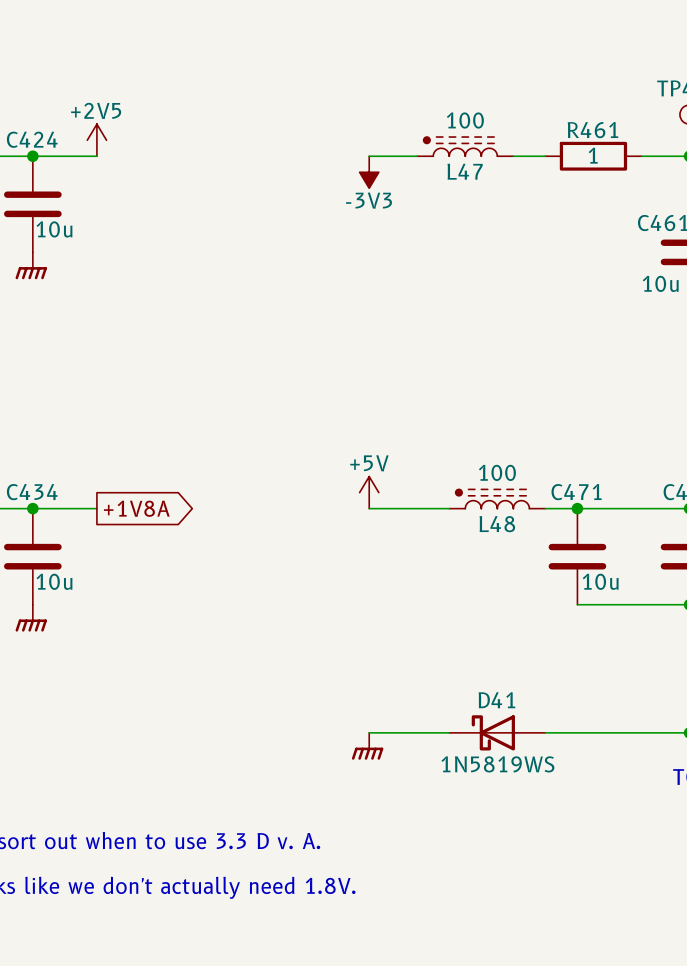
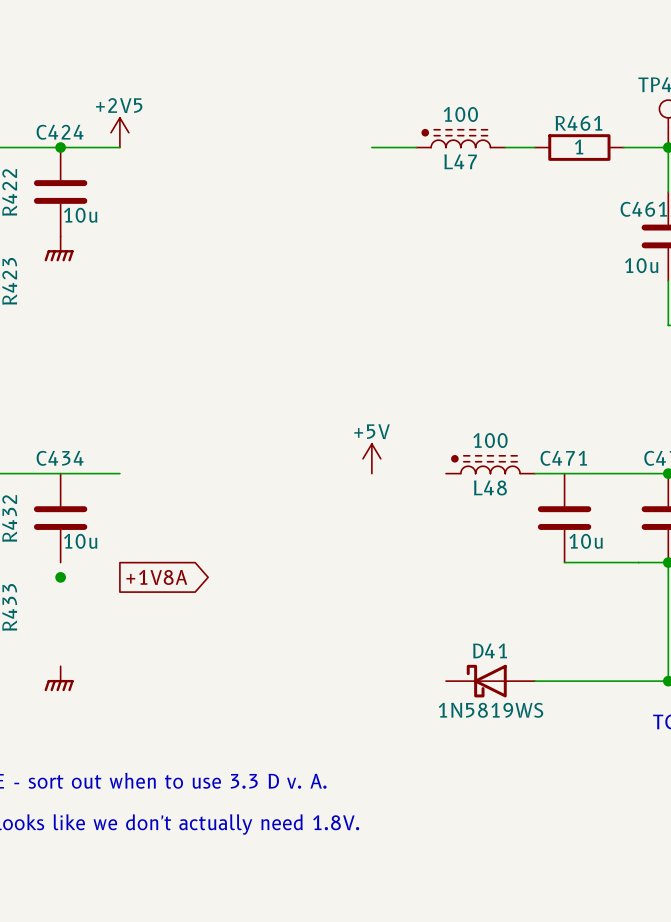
power symbol: -3V3 (369, 172) -> none
junction: (32, 508) -> none
global label position: +1V8A (136, 508) -> +1V8A (156, 577)
wire: (369, 508) (449, 508) -> none
junction: (577, 508) -> none
power symbol position: (31, 618) -> (59, 678)
junction: none -> (60, 577)
wire: (369, 732) (449, 732) -> none
power symbol: (367, 746) -> none

